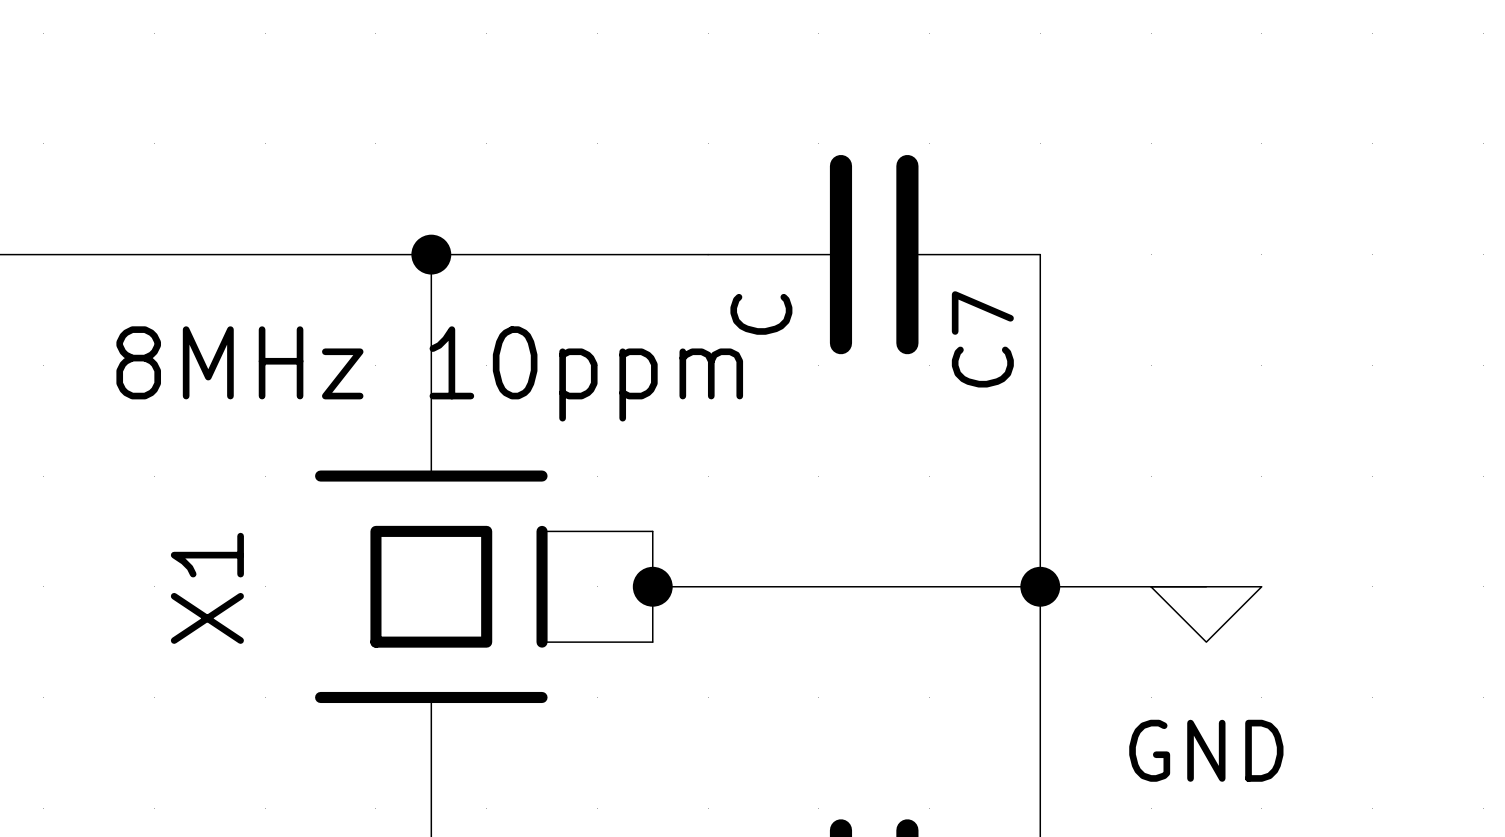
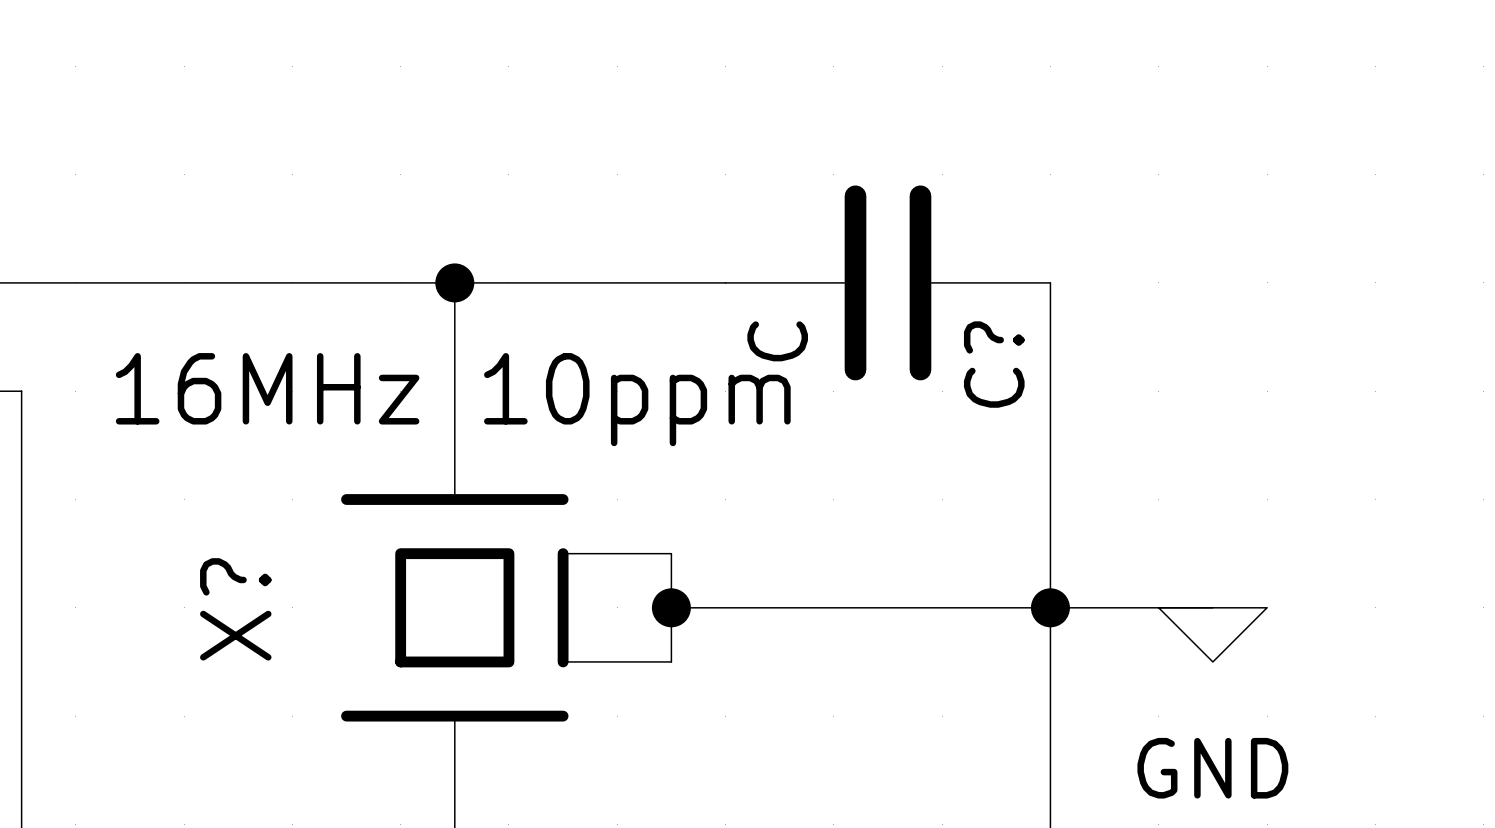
C7 name: C7 (982, 339) -> C? (994, 364)
X1 value: 8MHz 10ppm (429, 373) -> 16MHz 10ppm (453, 399)
X1 name: X1 (207, 588) -> X? (235, 609)

